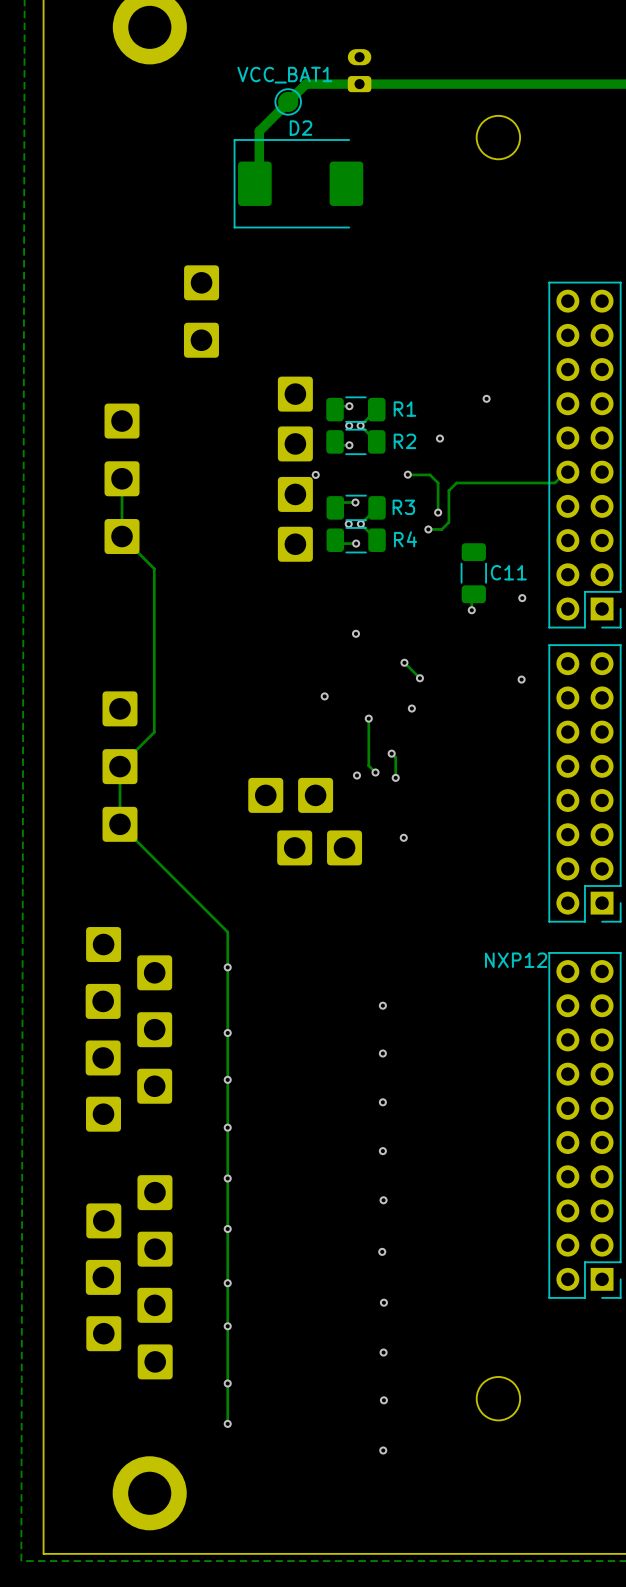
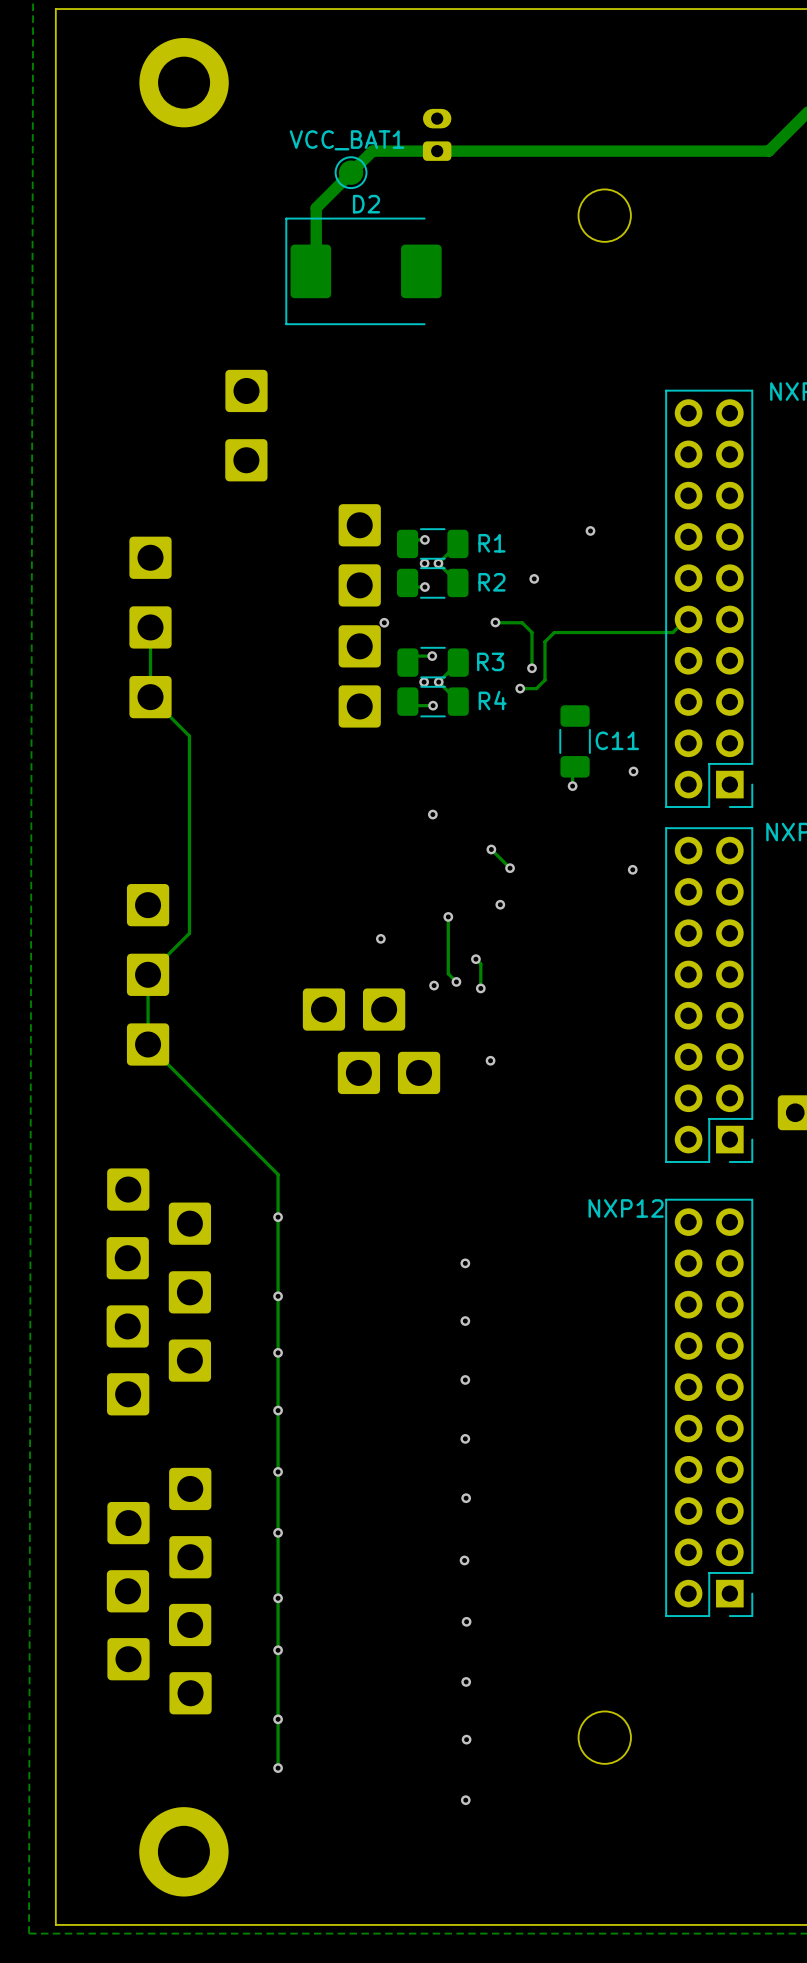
via position: (324, 696) -> (380, 938)

